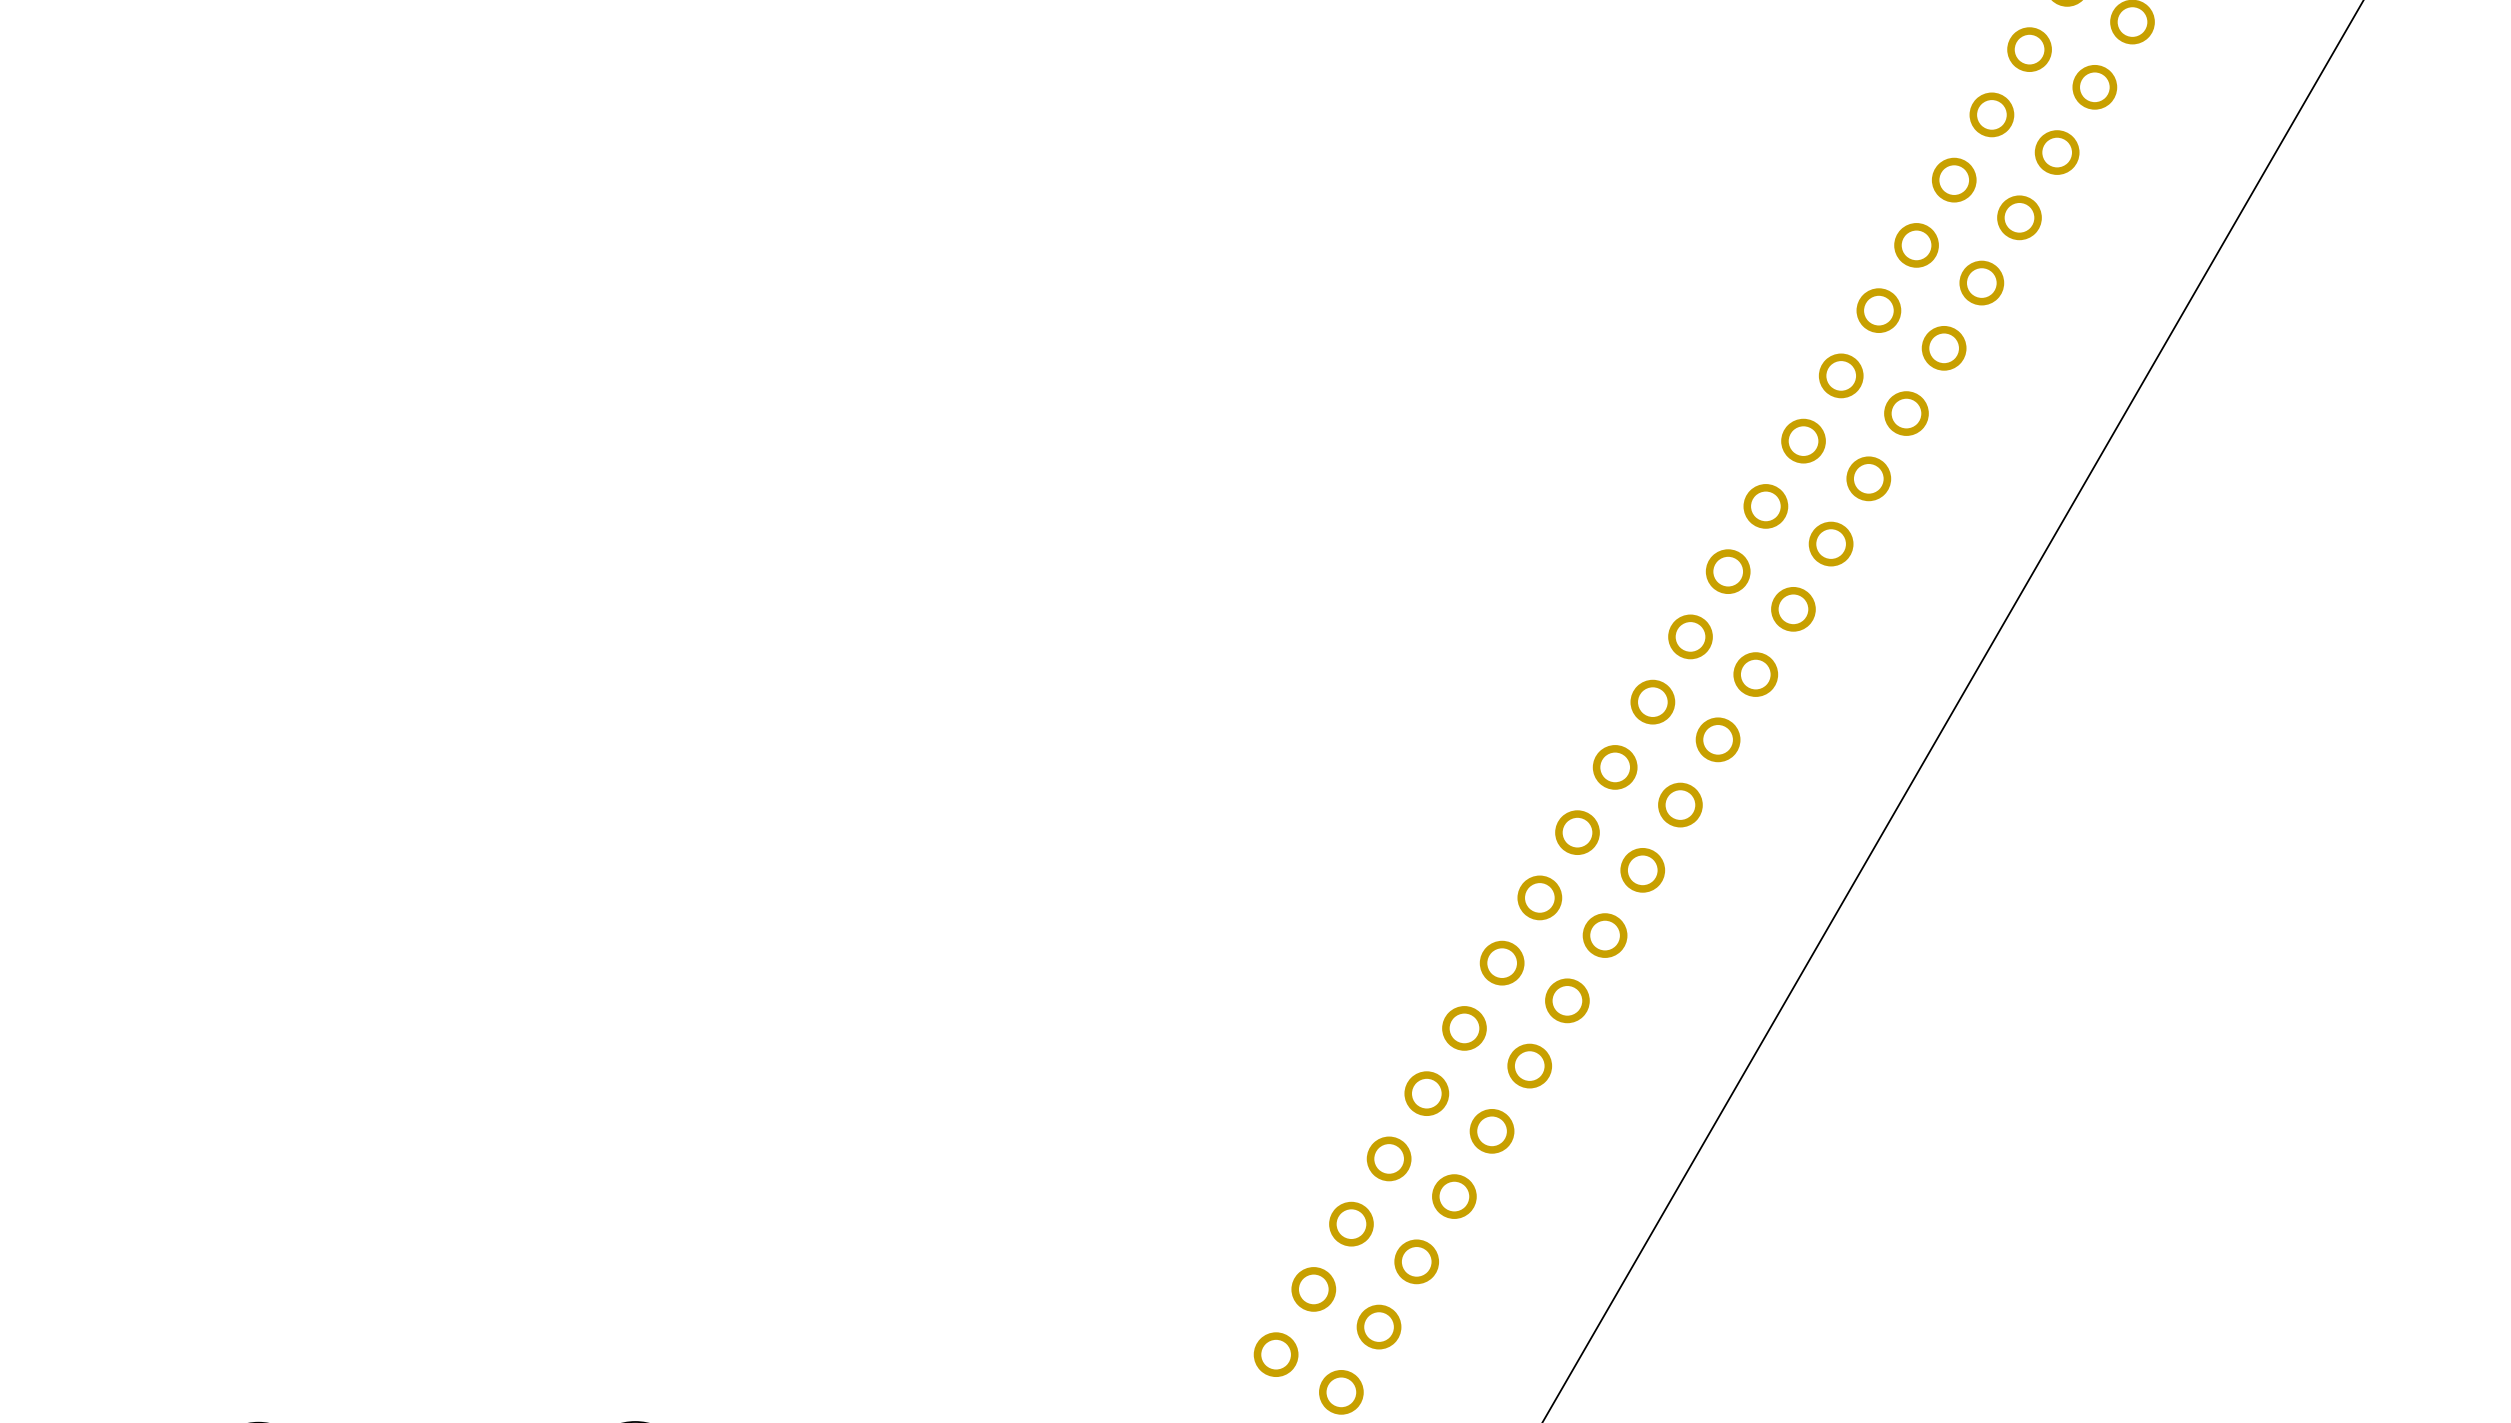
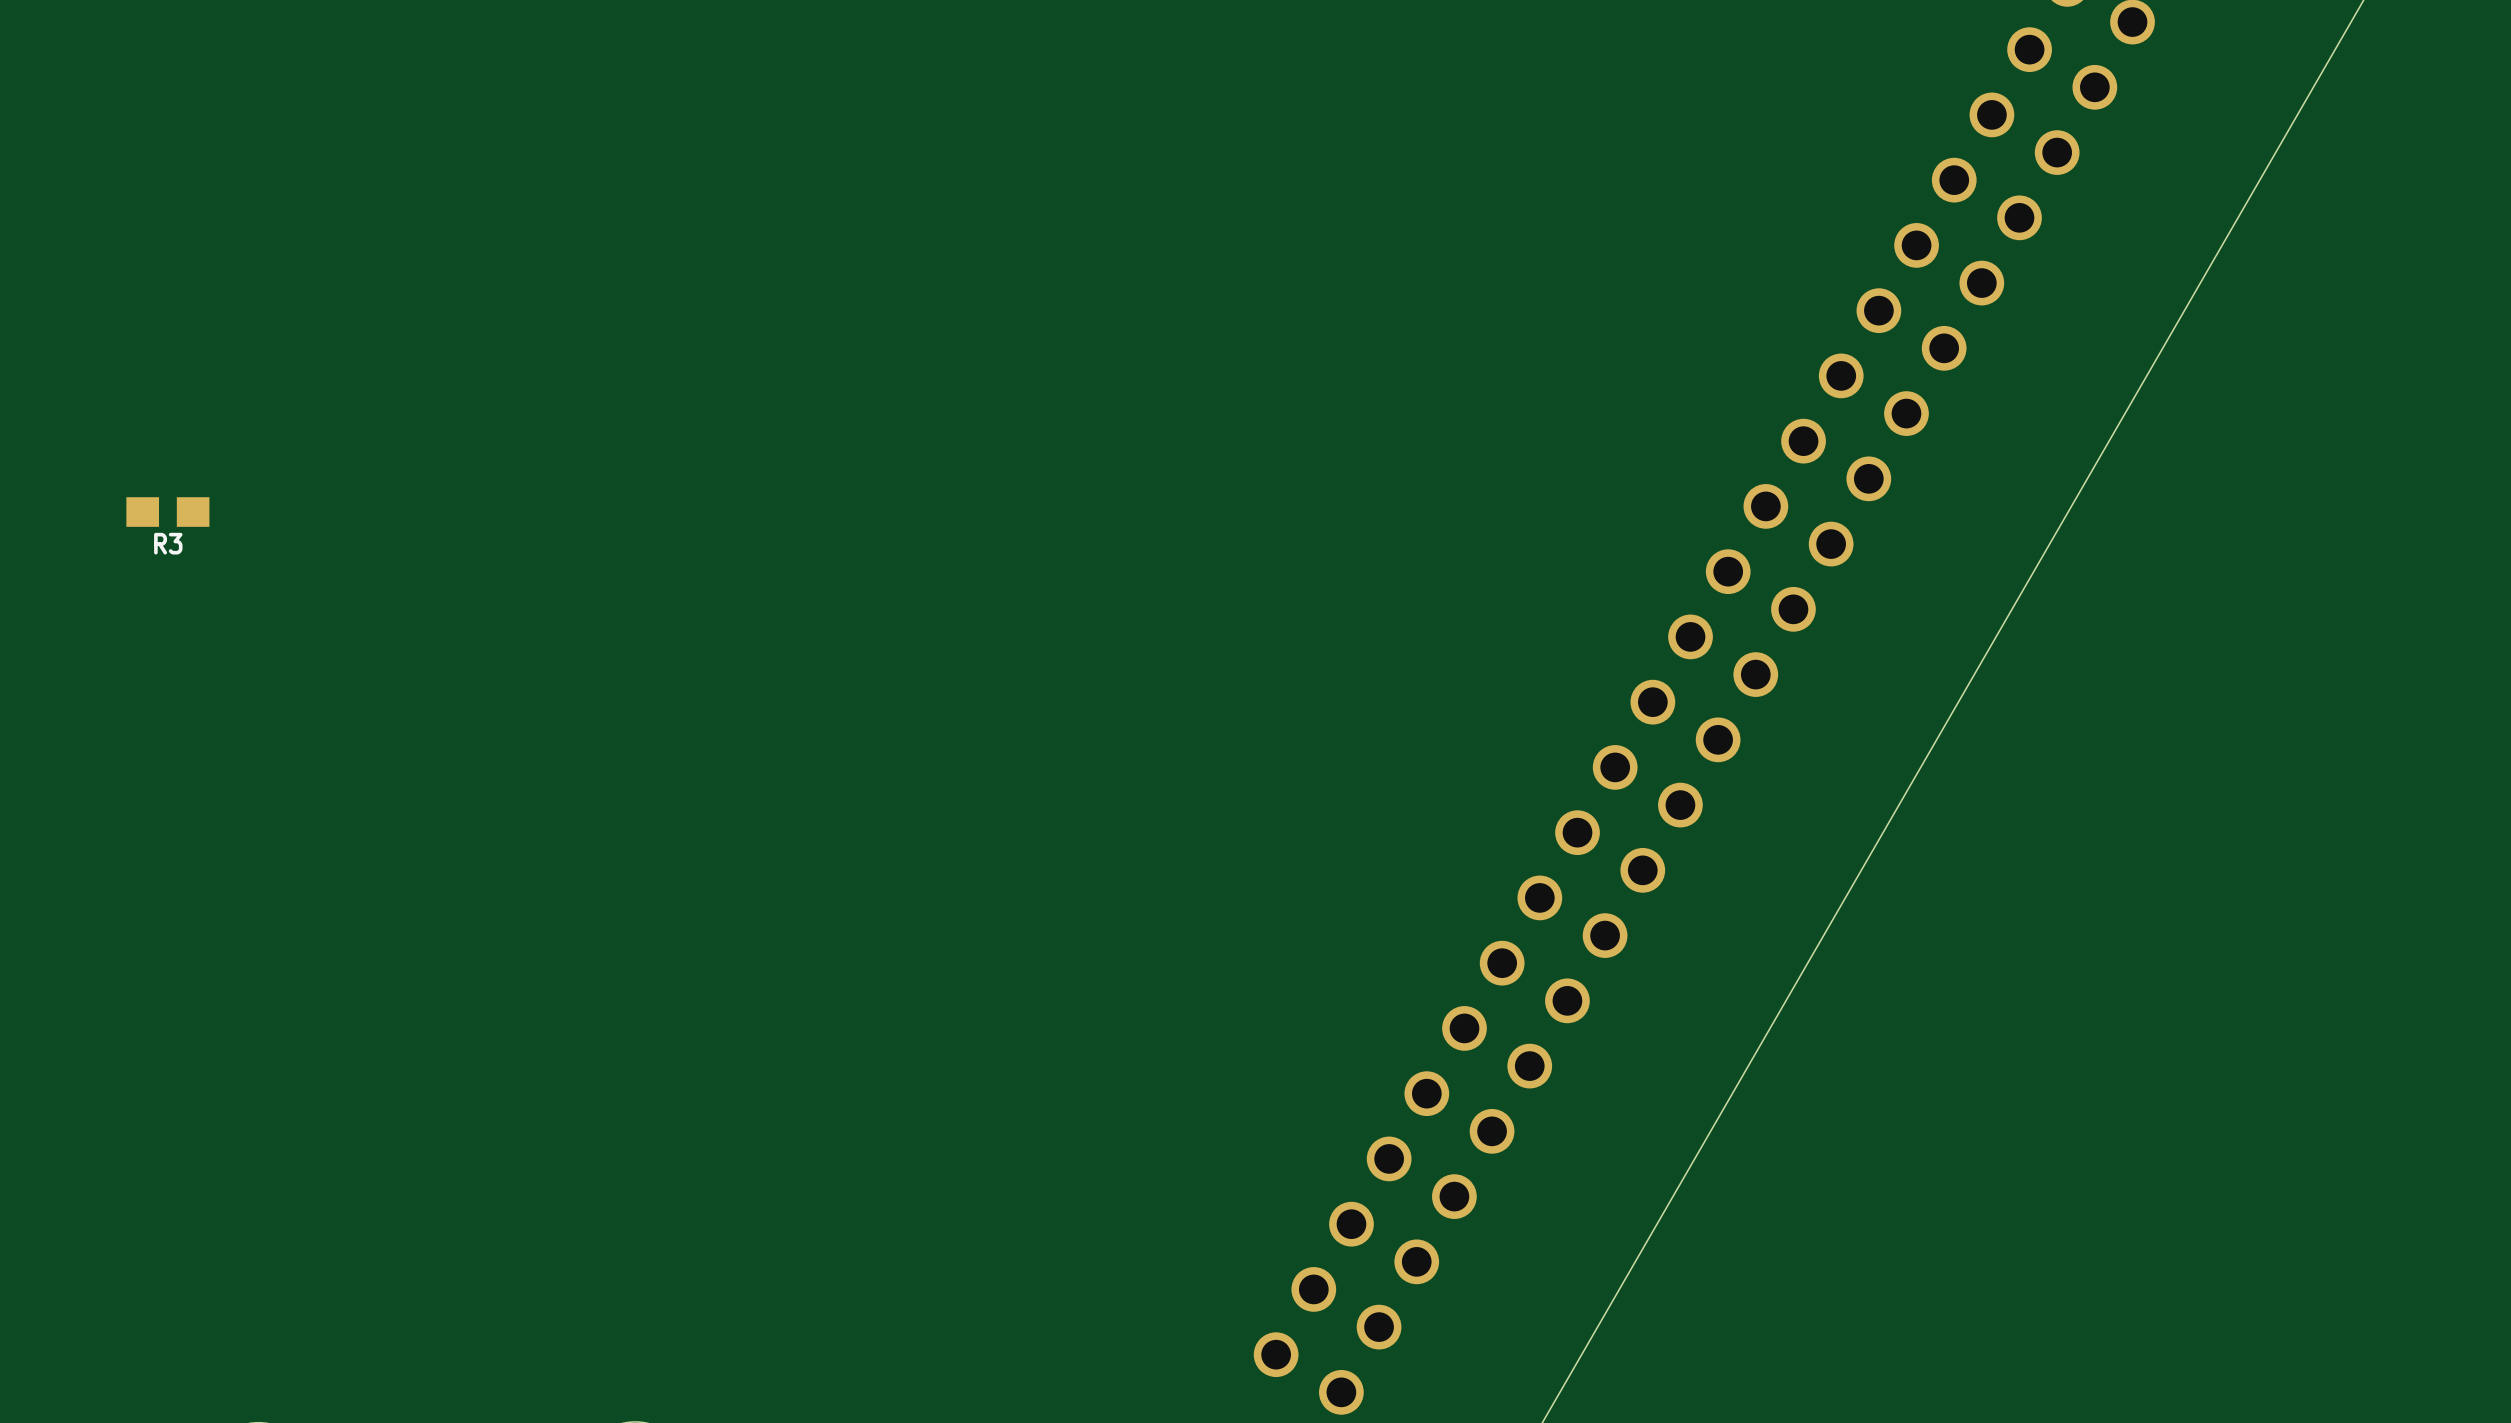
R3: none -> (167, 512)

